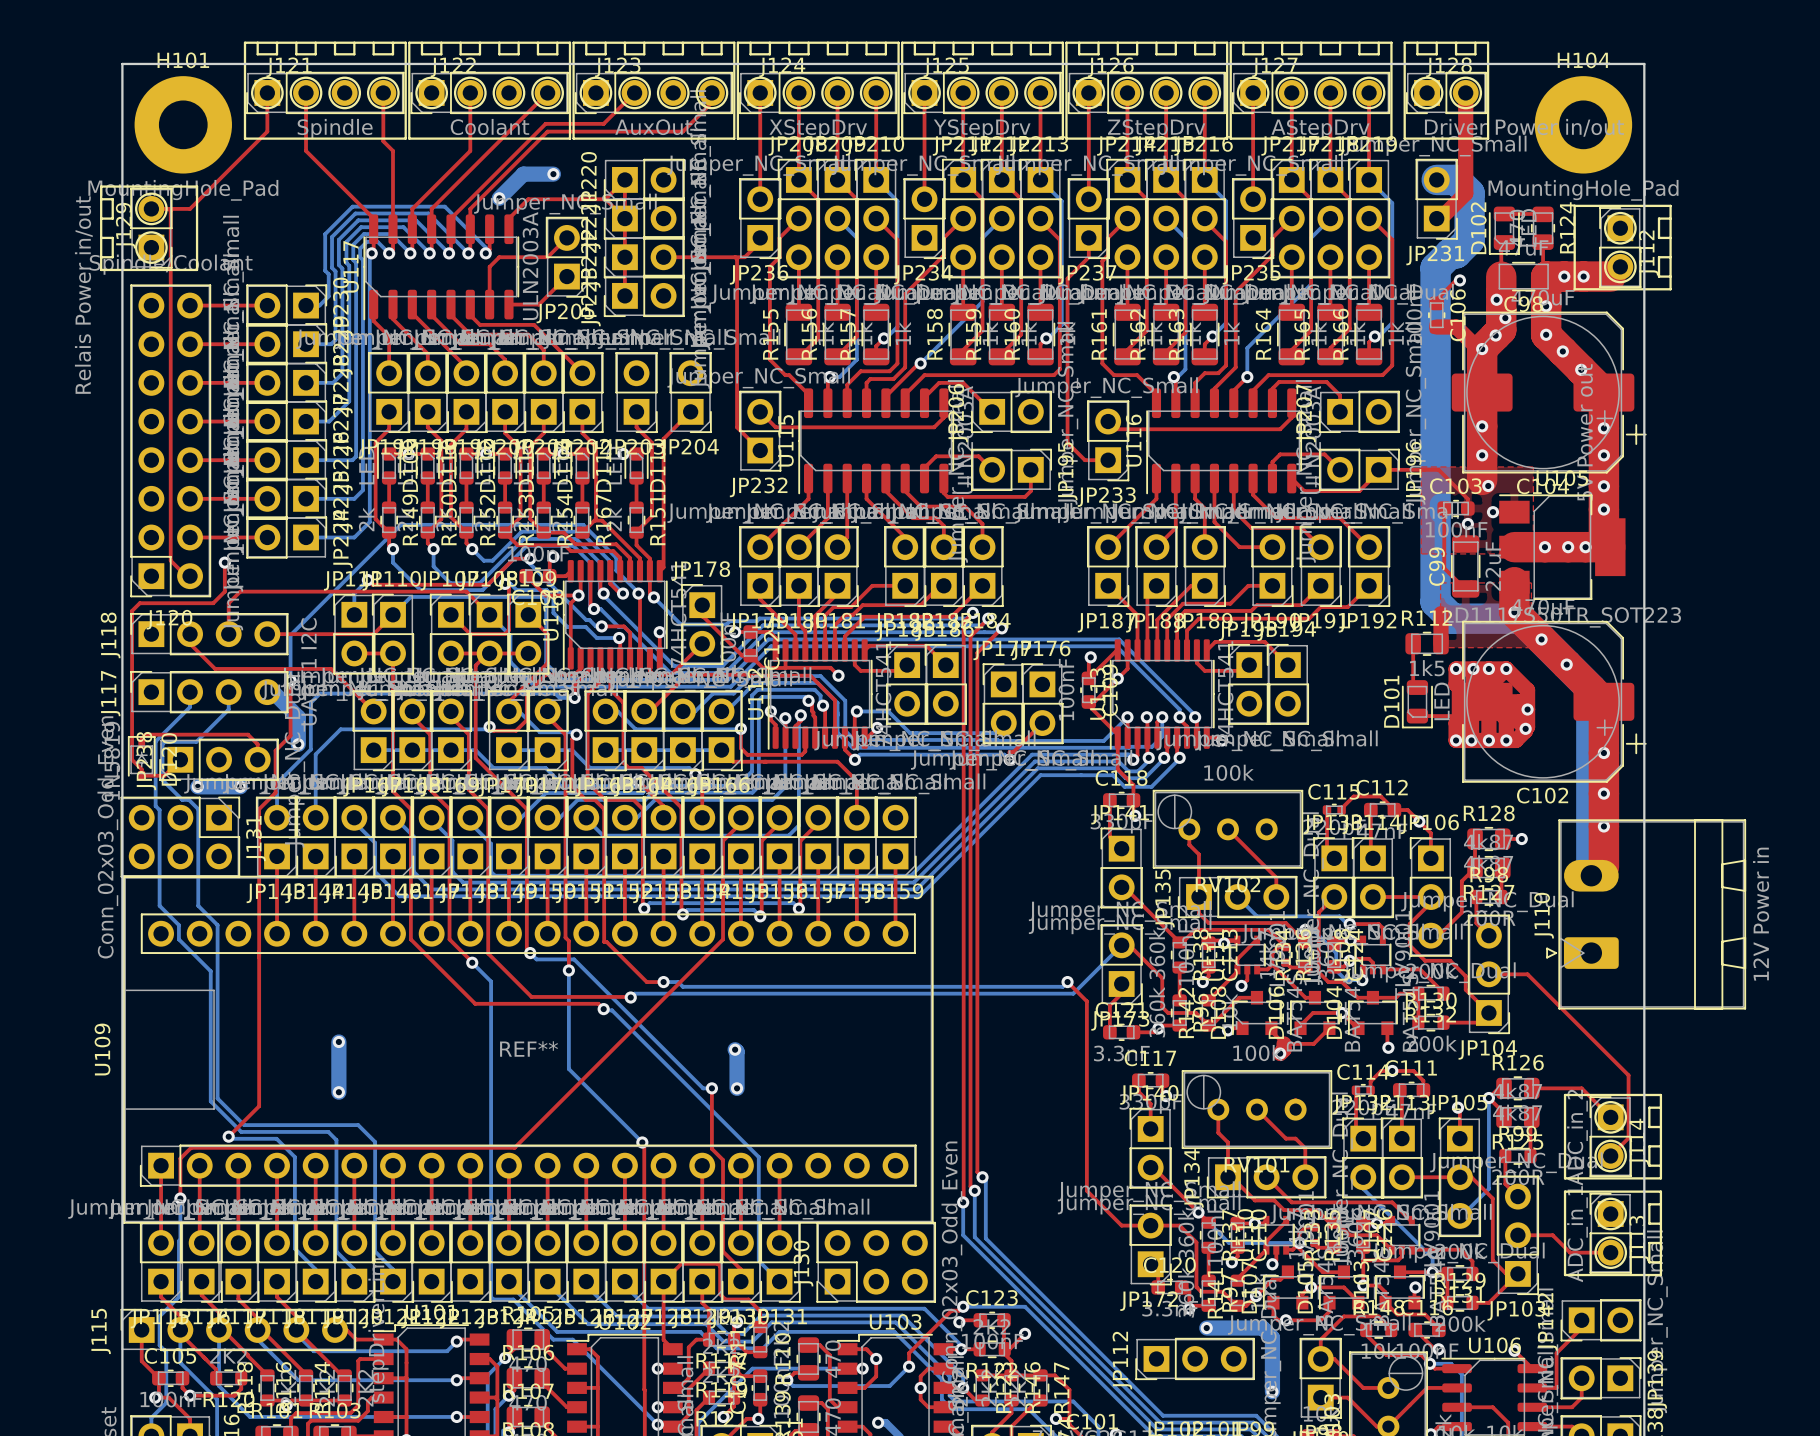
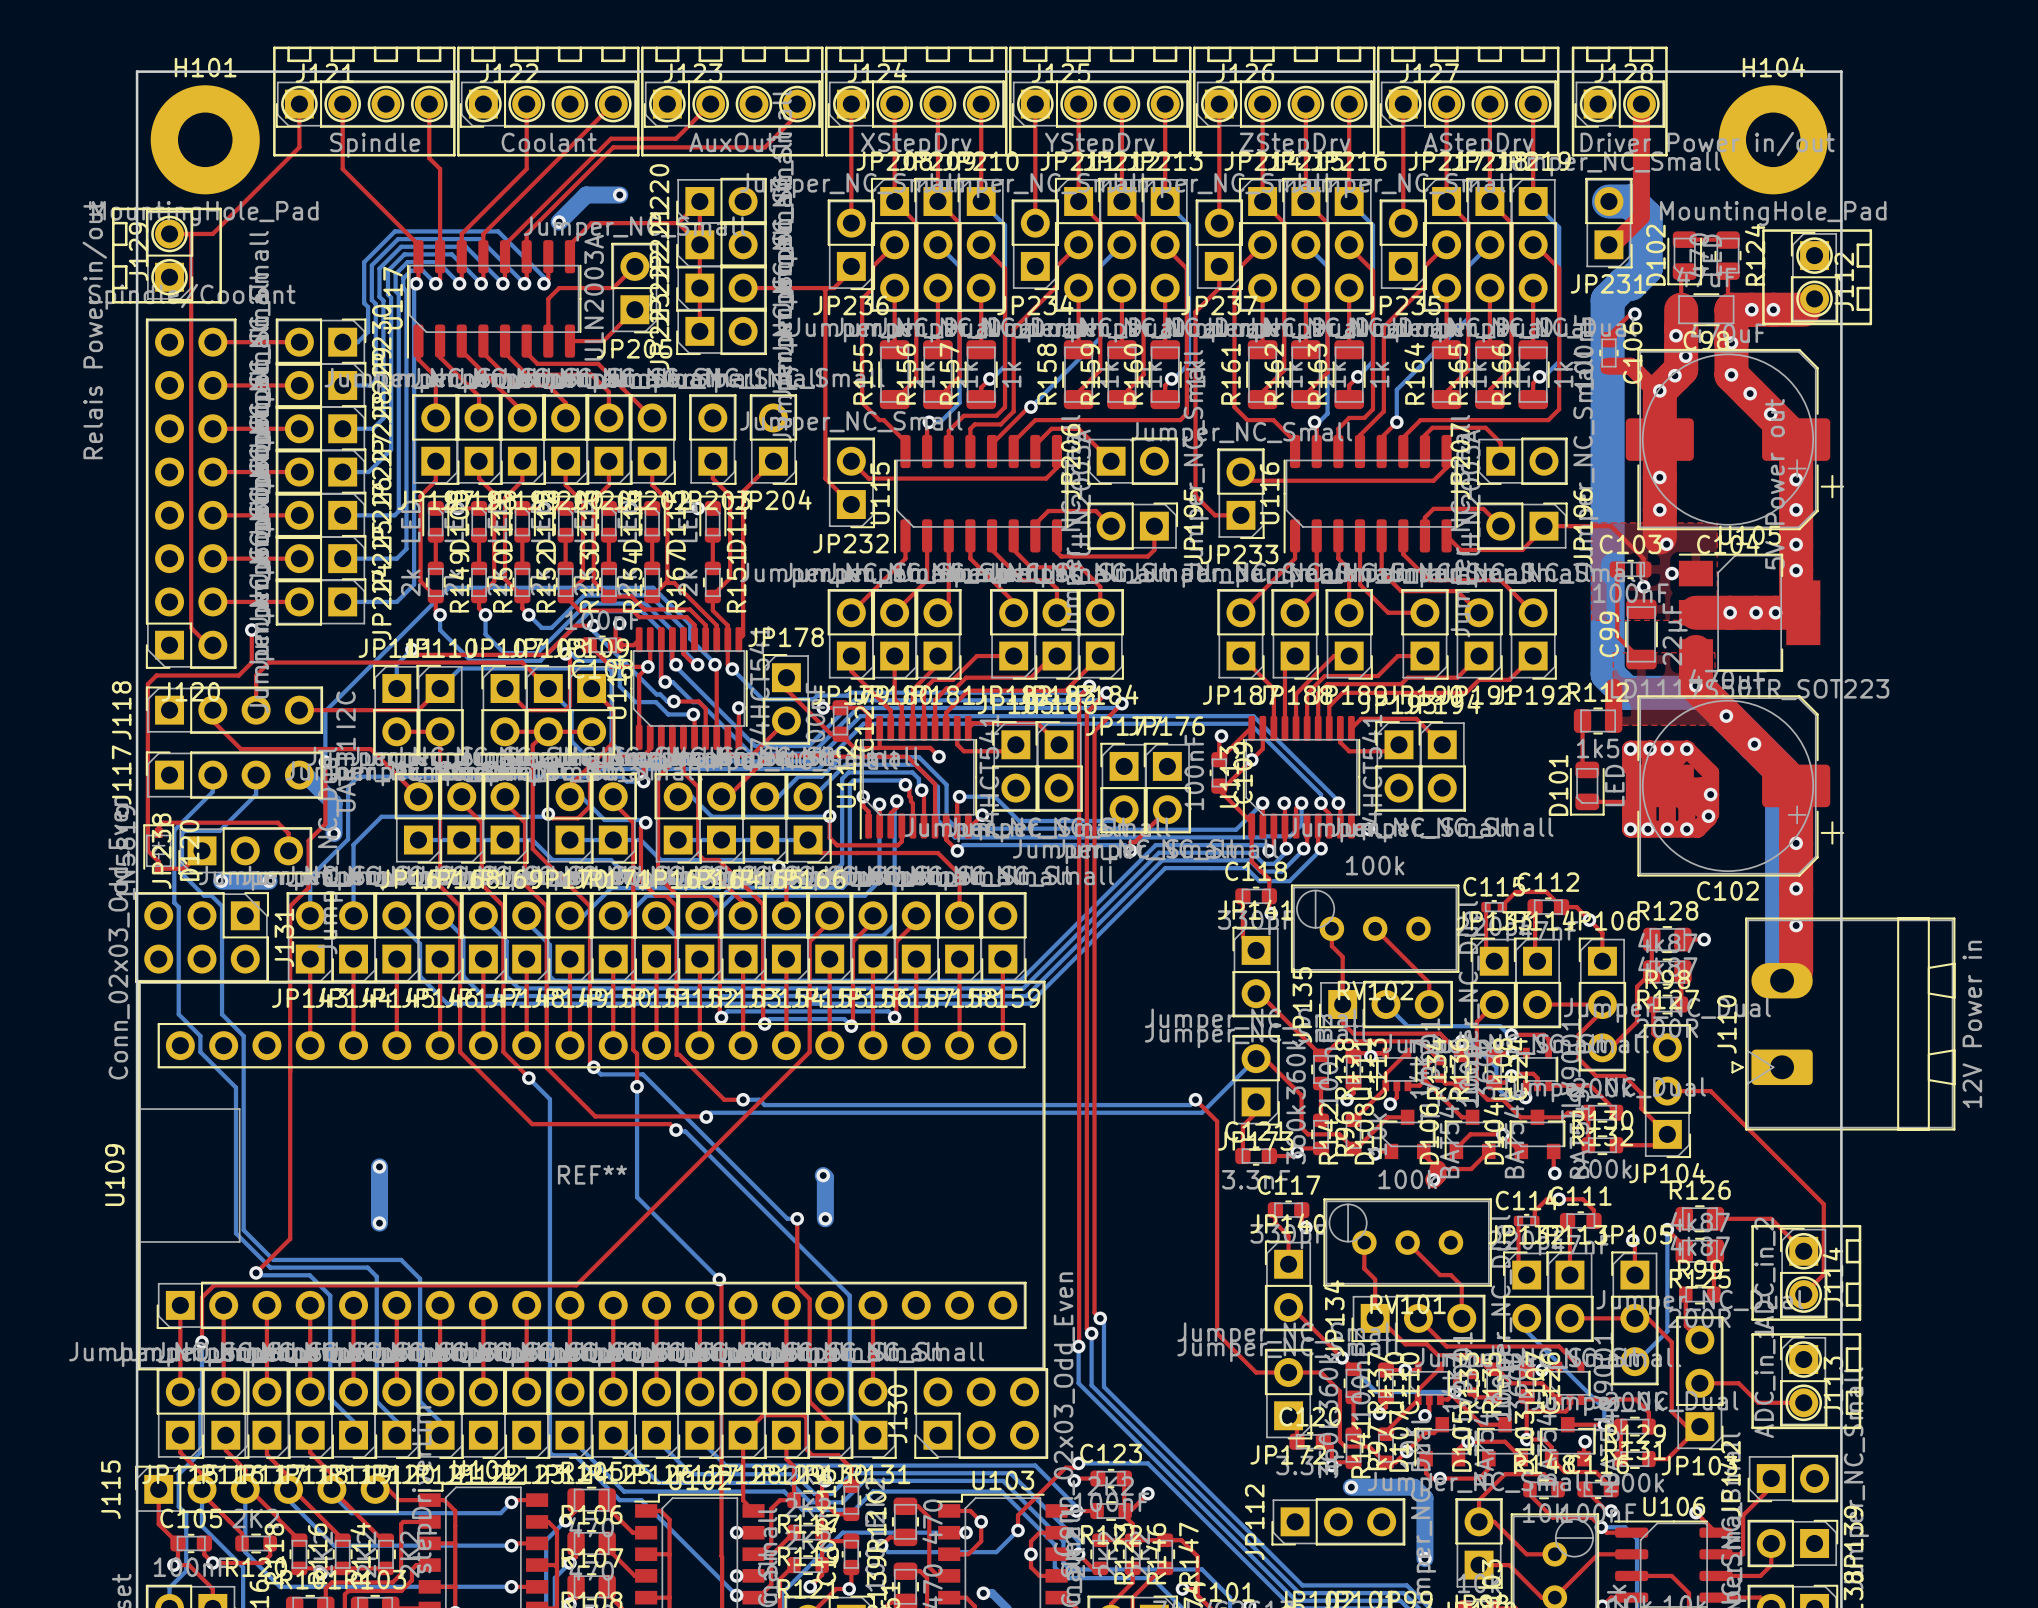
C99 value: 22uF (1493, 566) -> 22µF (1675, 634)

